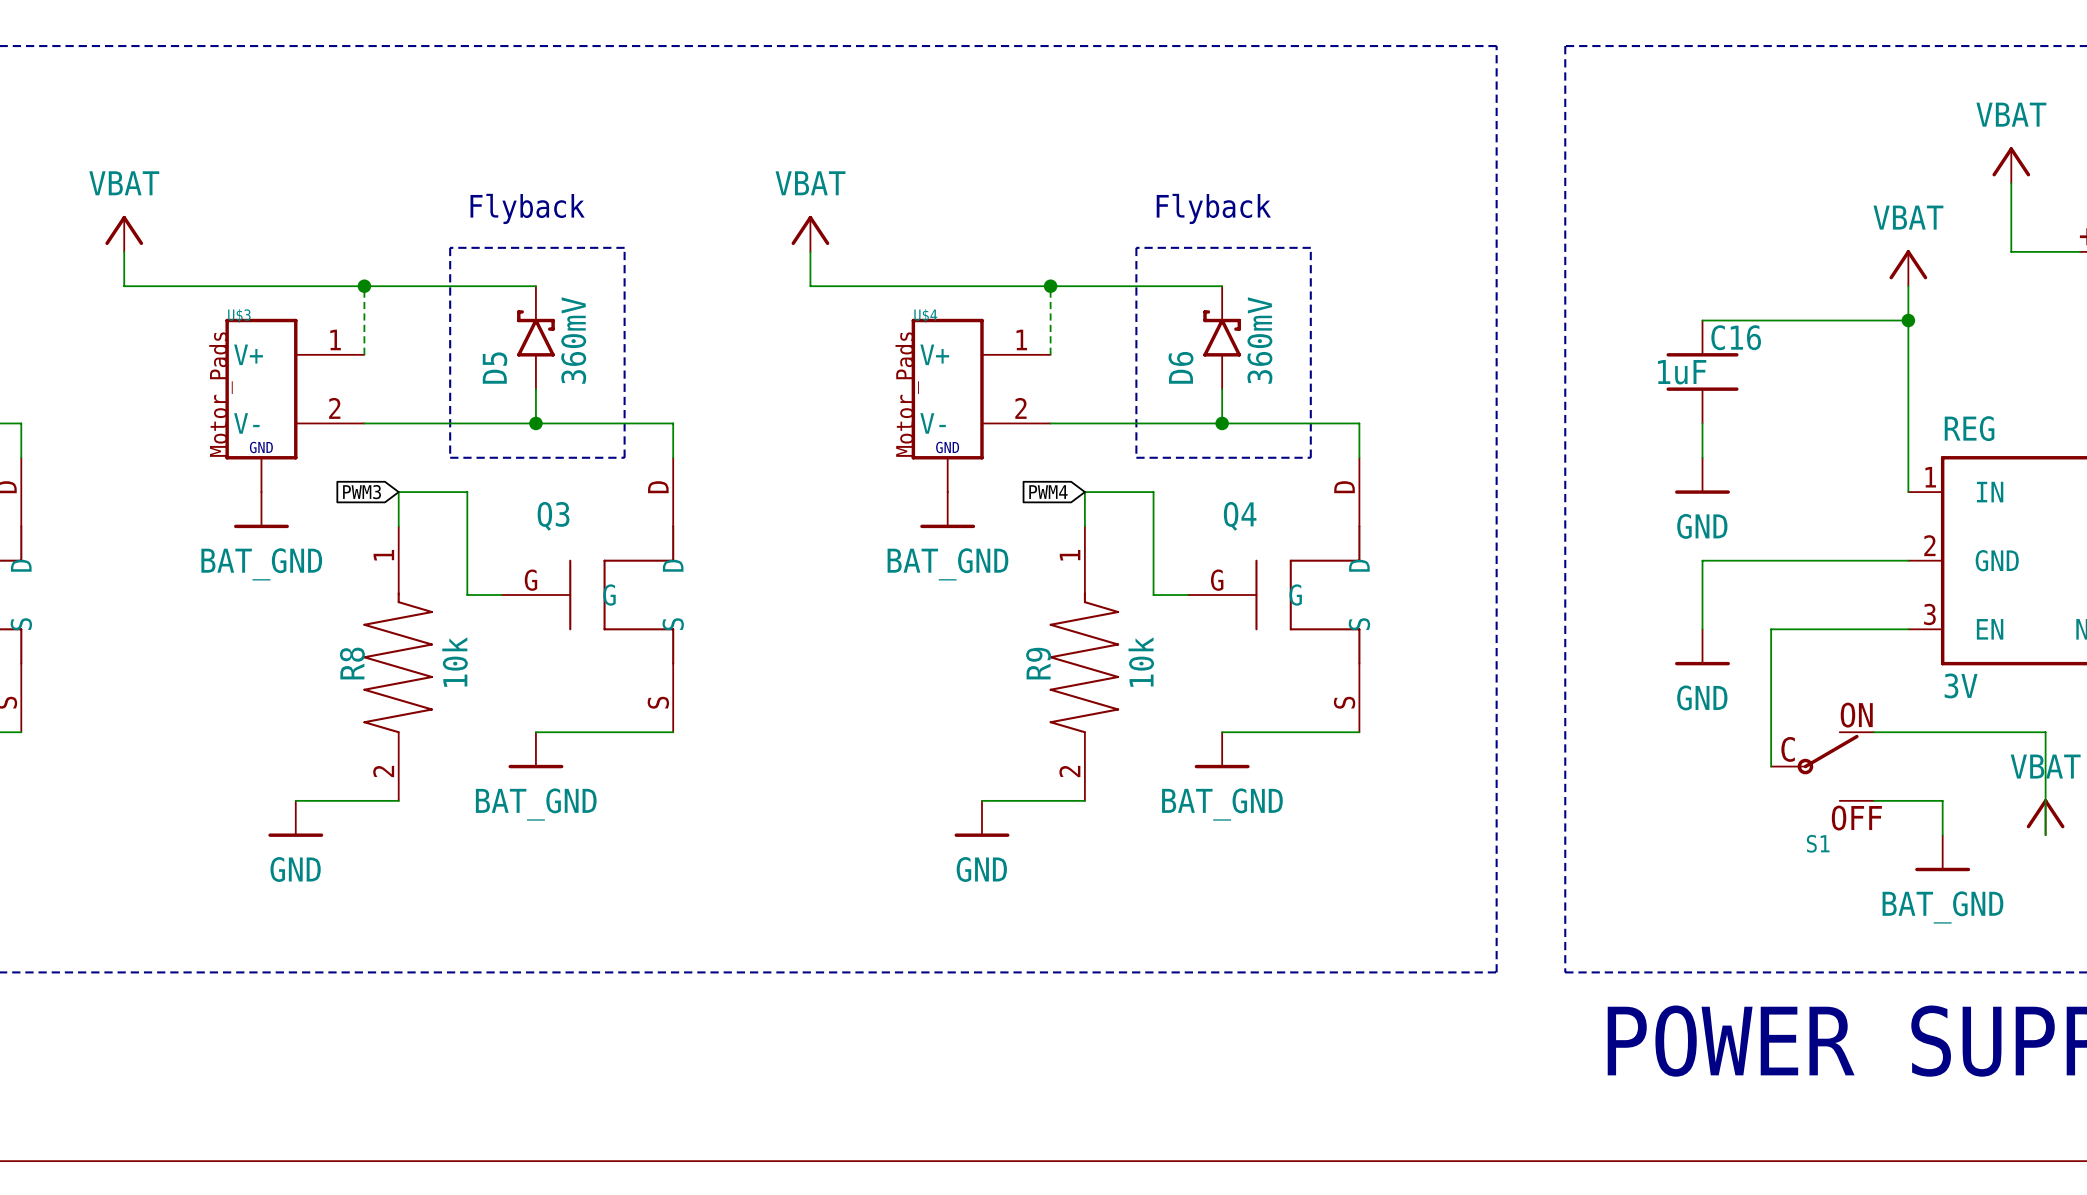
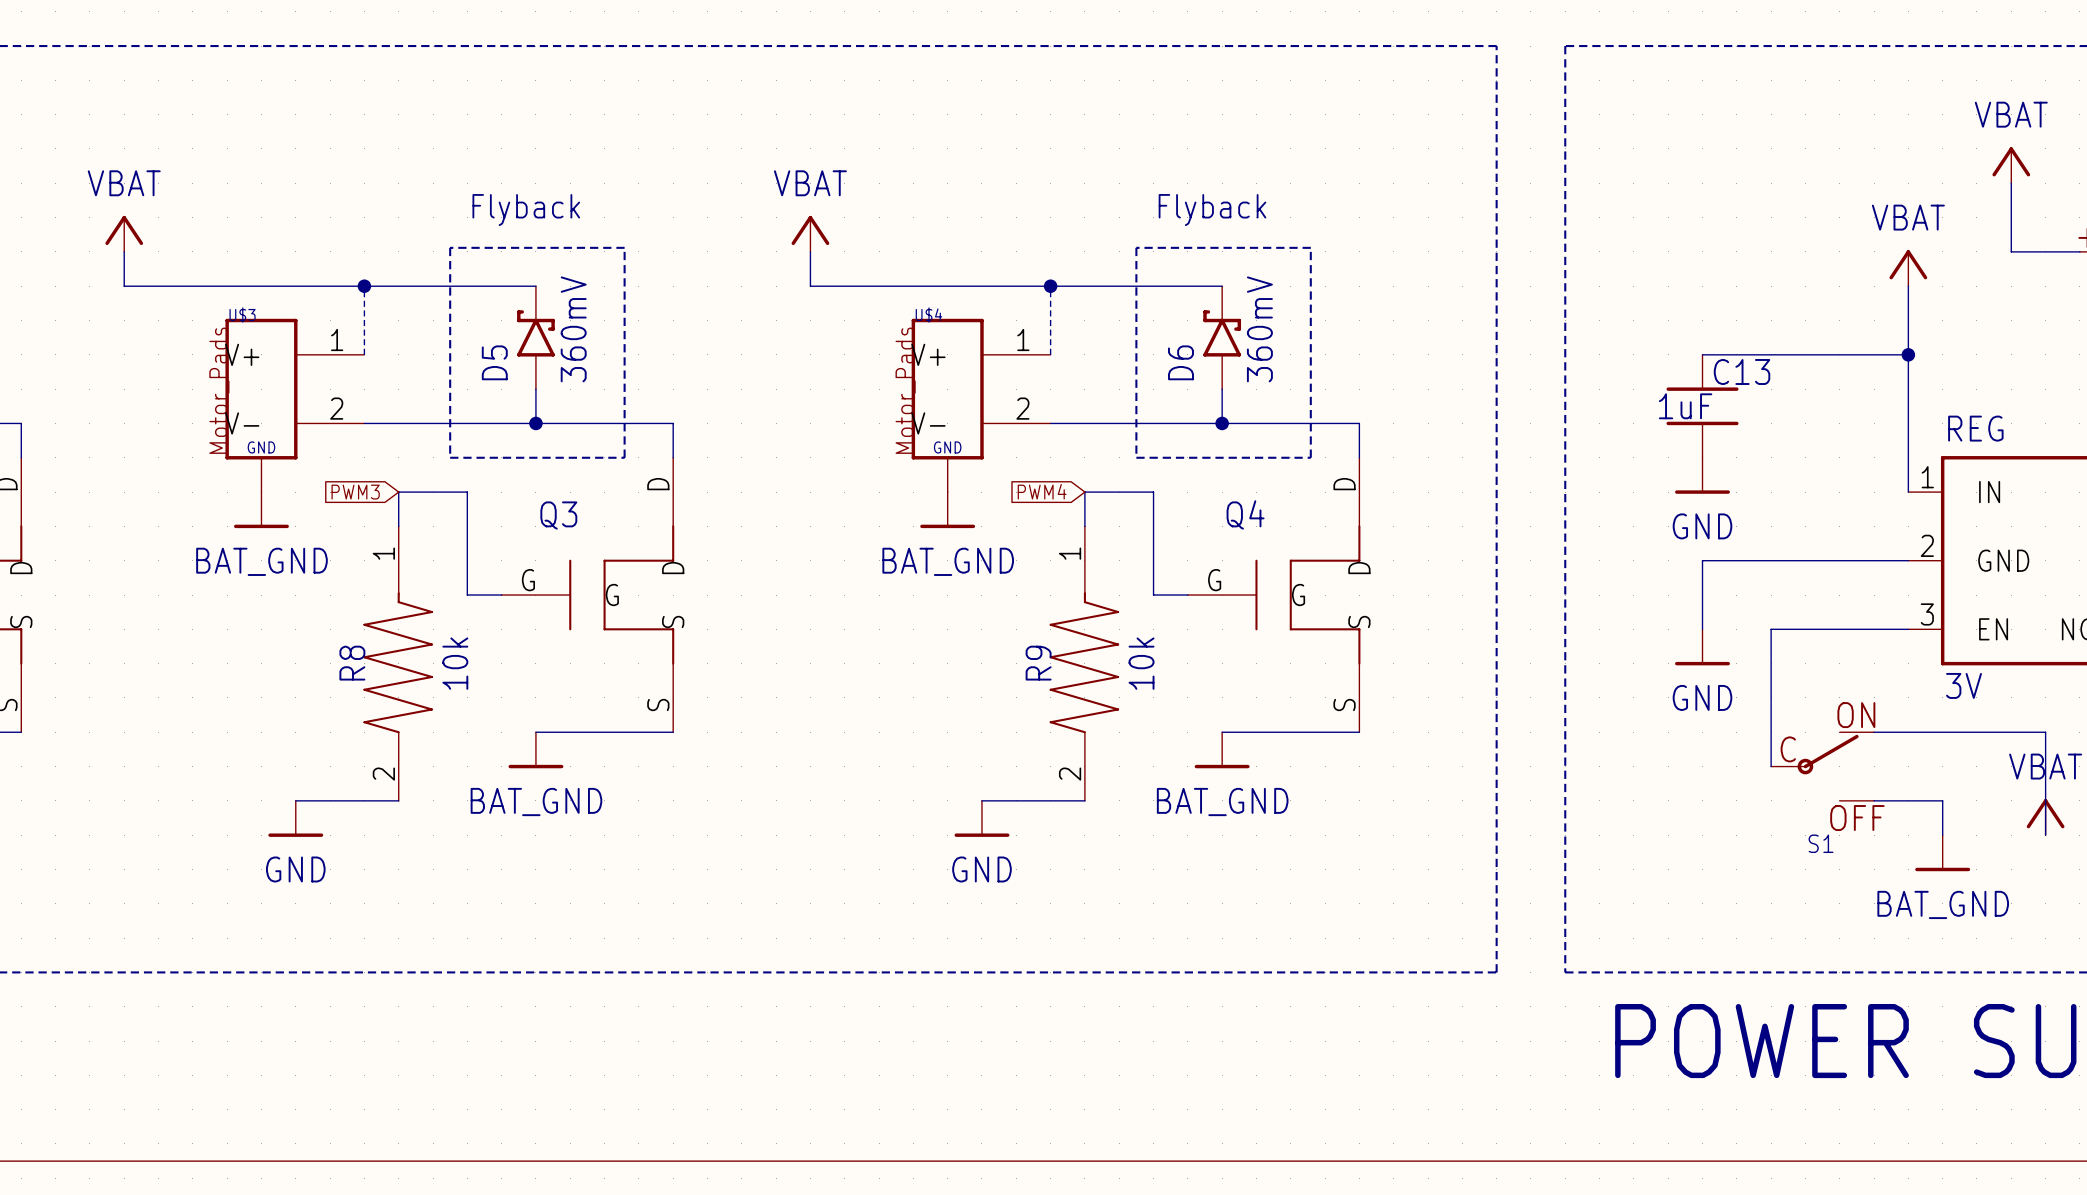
wire: (1702, 320) (1908, 320) -> (1702, 354) (1908, 354)
junction position: (1908, 320) -> (1908, 354)
C16: 1uF (1702, 371) -> none
C13: none -> 1uF (1702, 406)

